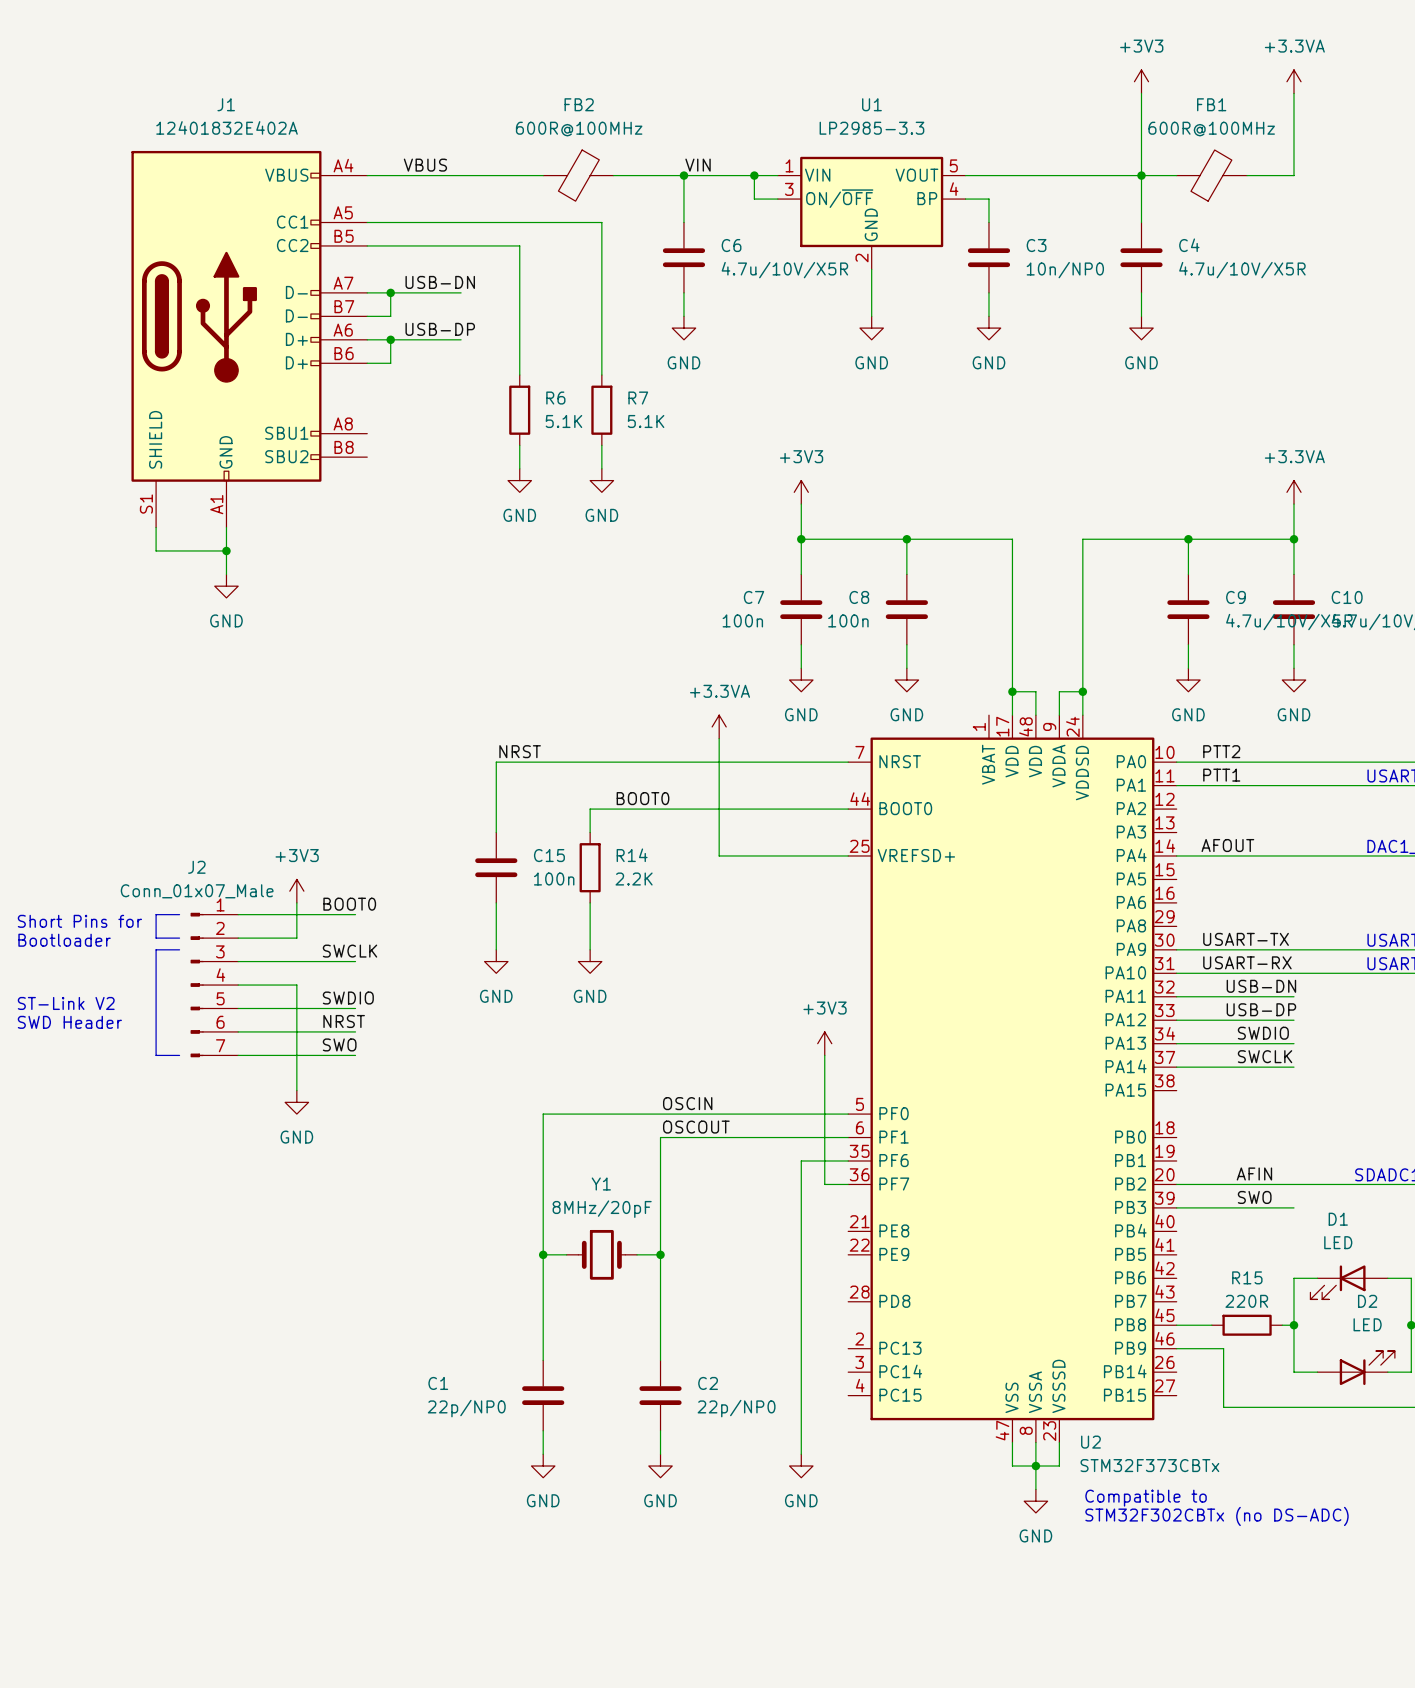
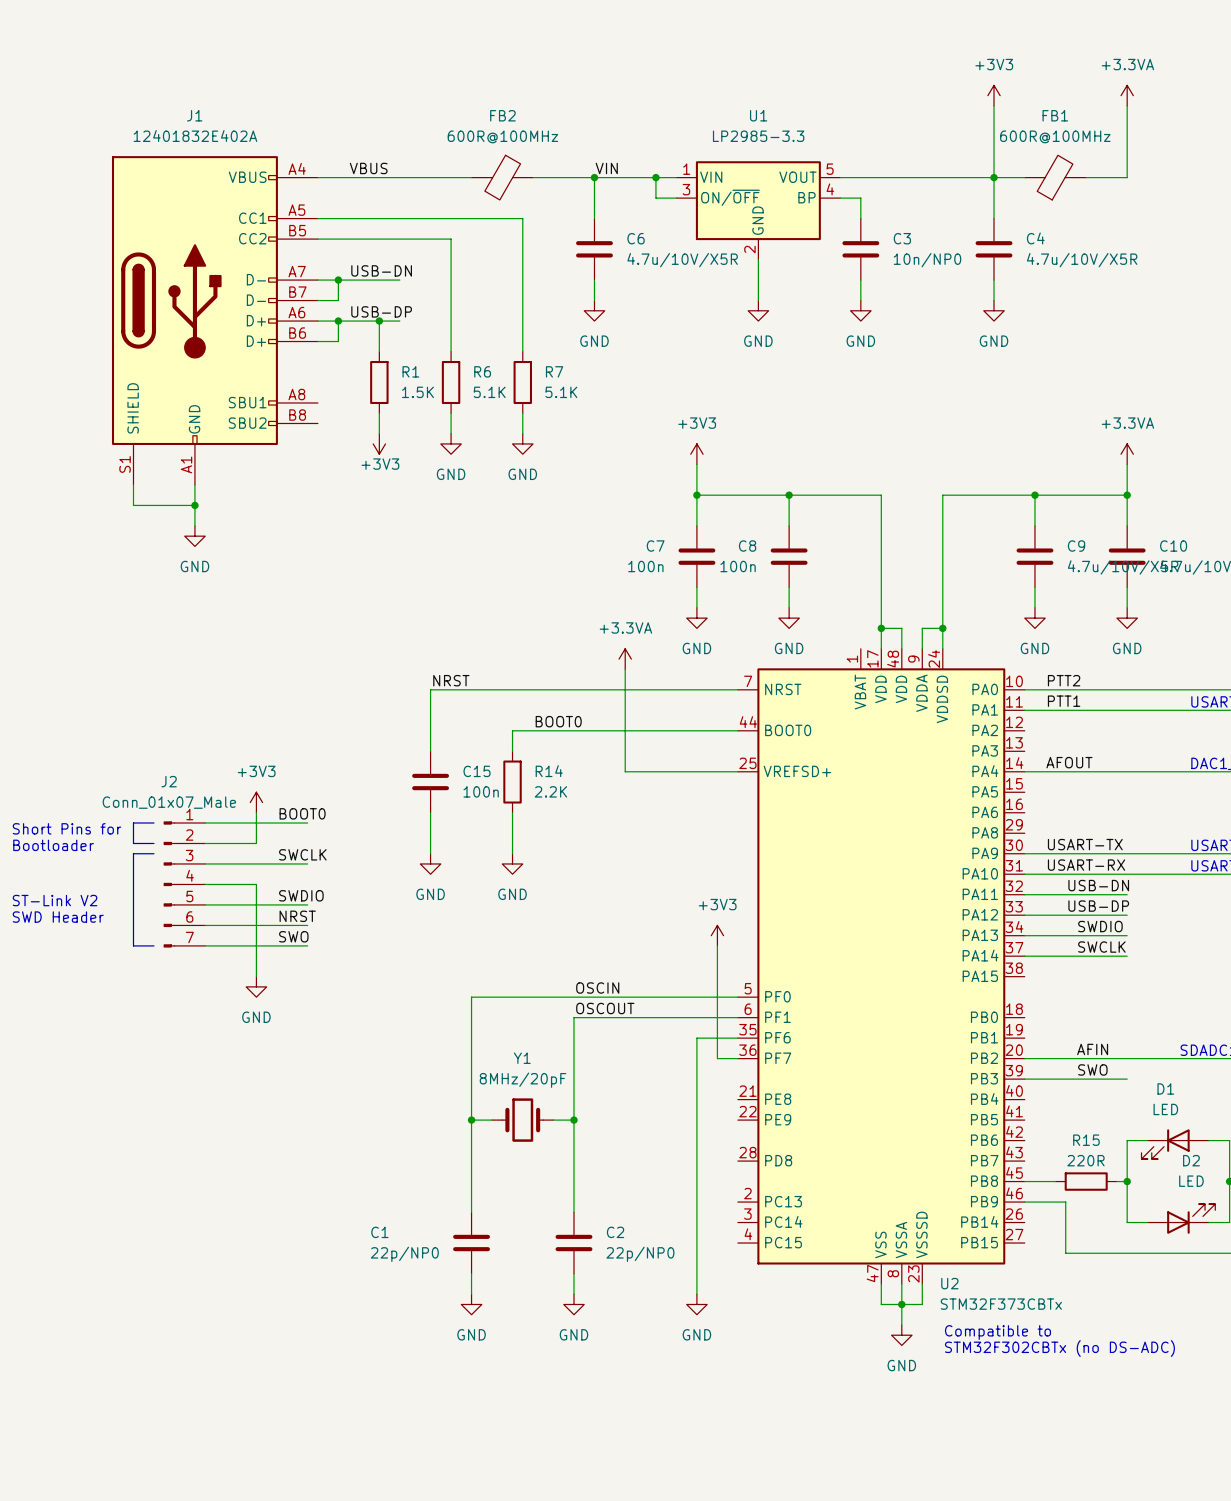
wire: none -> (379, 321) (379, 351)
junction: none -> (379, 321)
R1: none -> 1.5K (379, 382)
wire: none -> (379, 413) (379, 433)
power symbol: none -> +3V3 (379, 443)

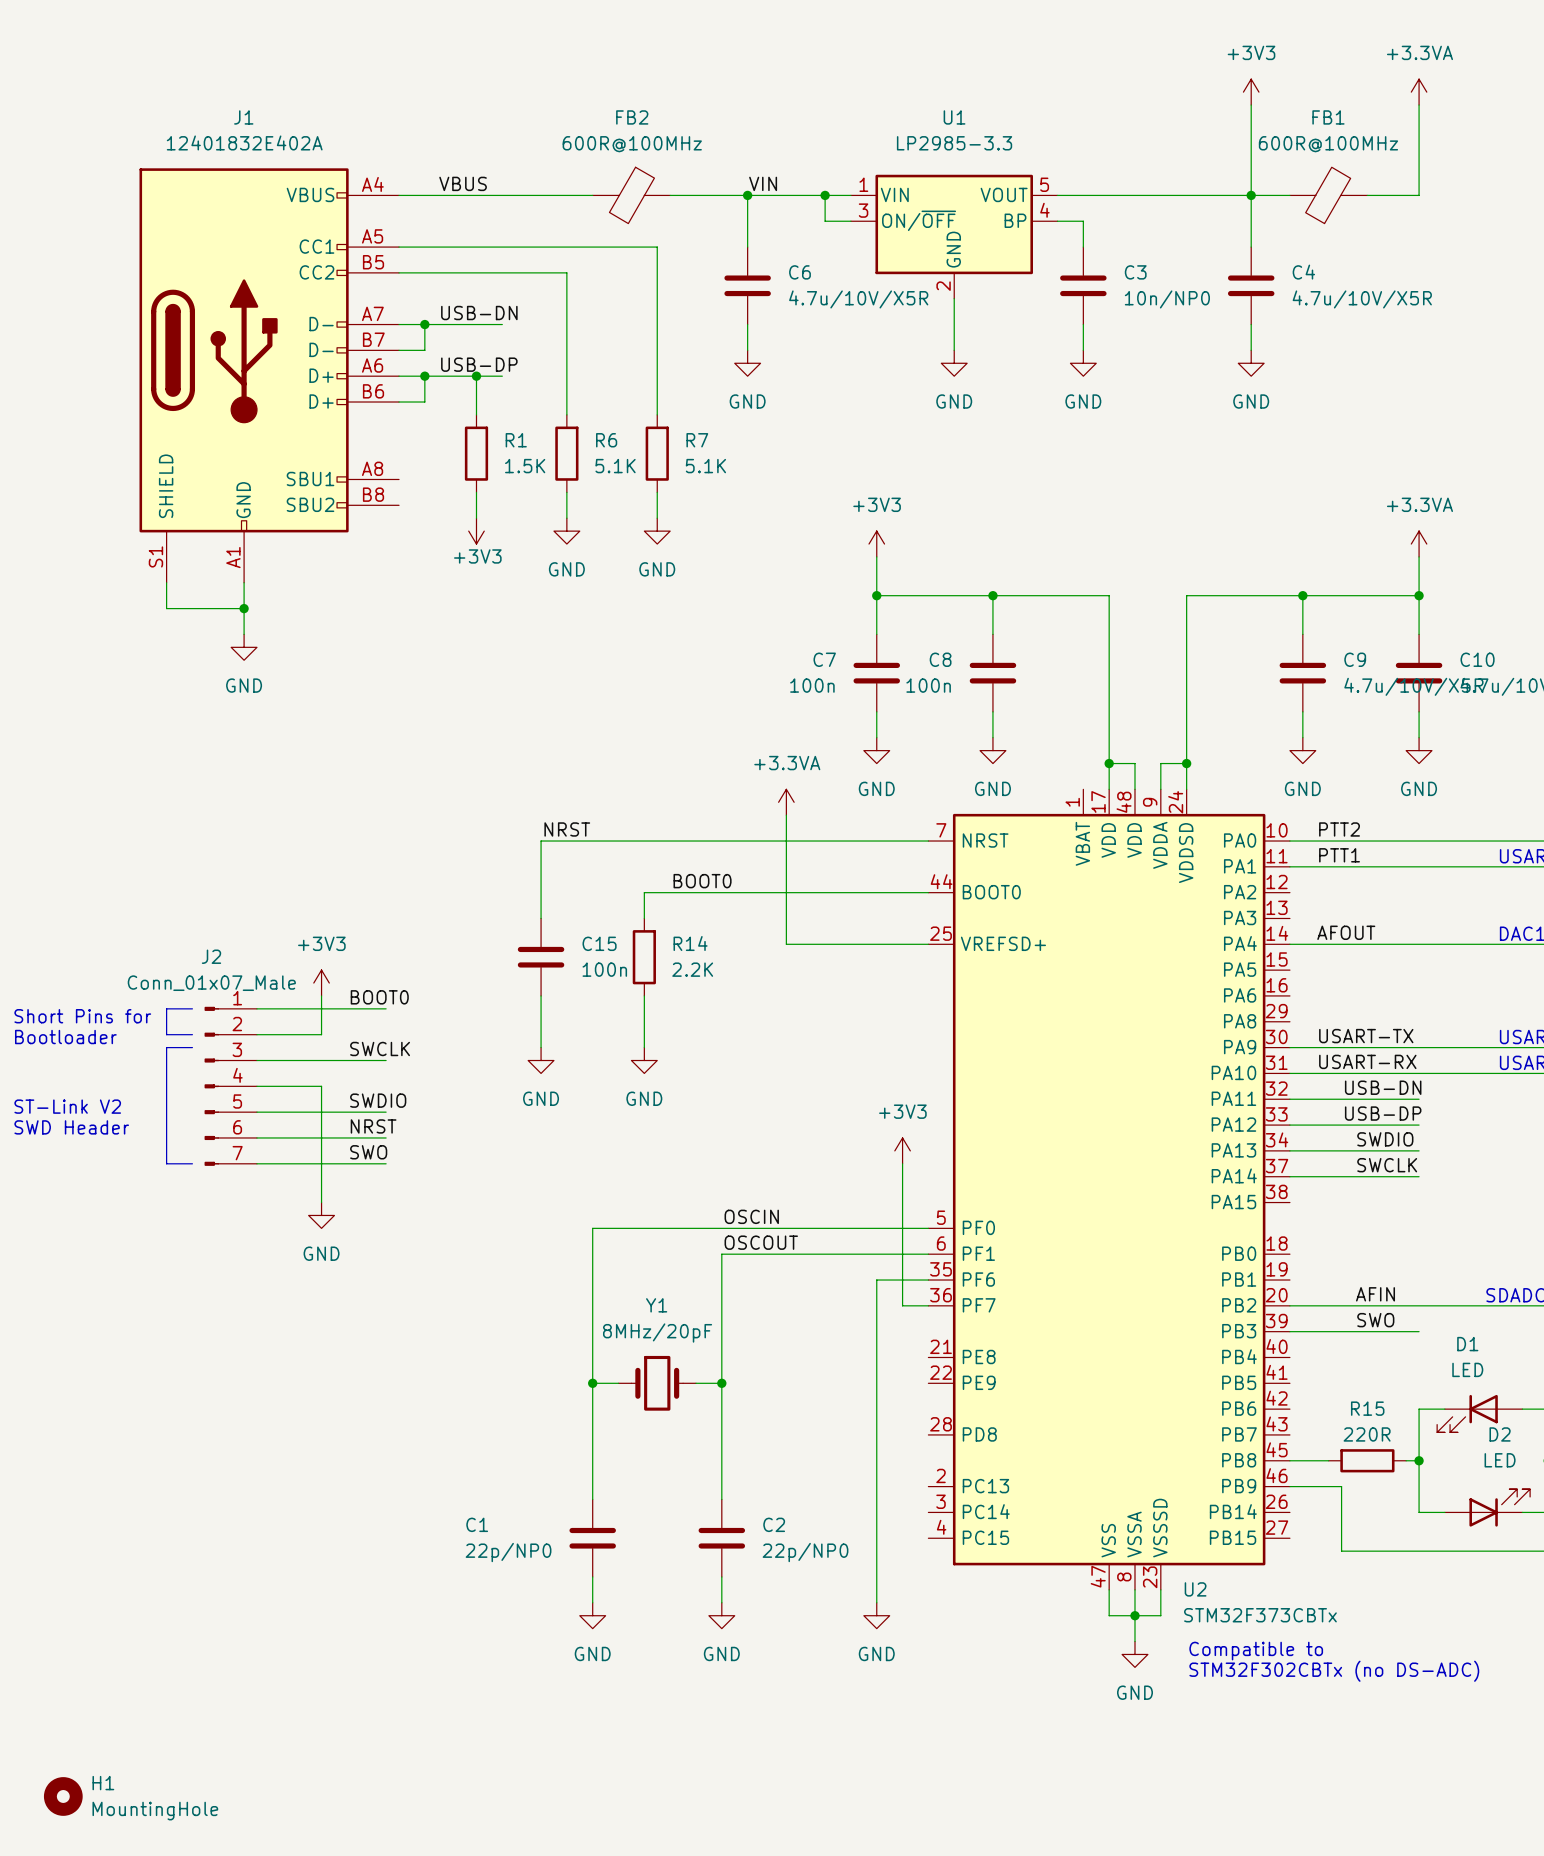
H1: none -> MountingHole (63, 1796)

